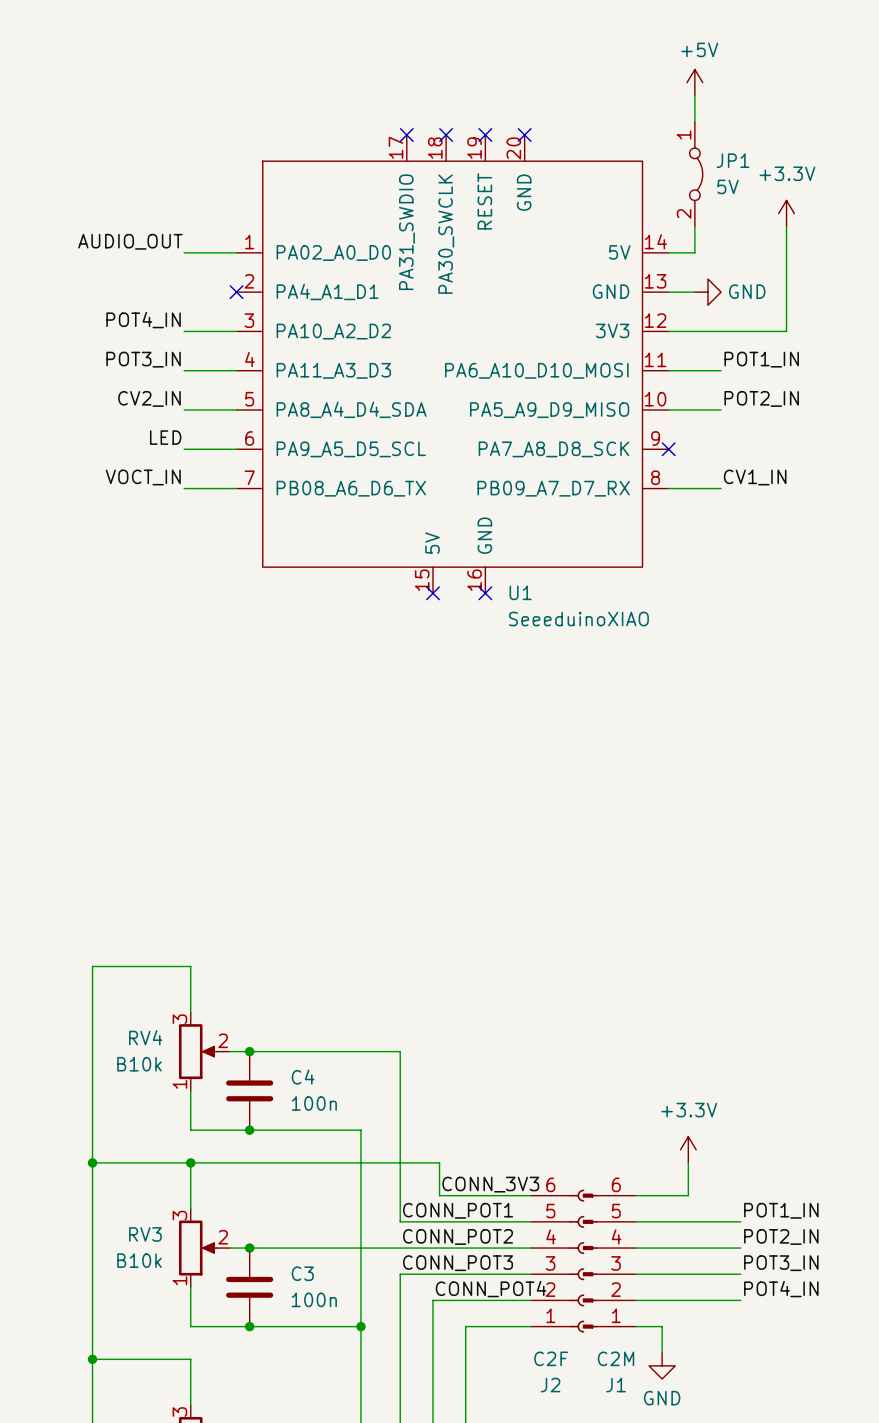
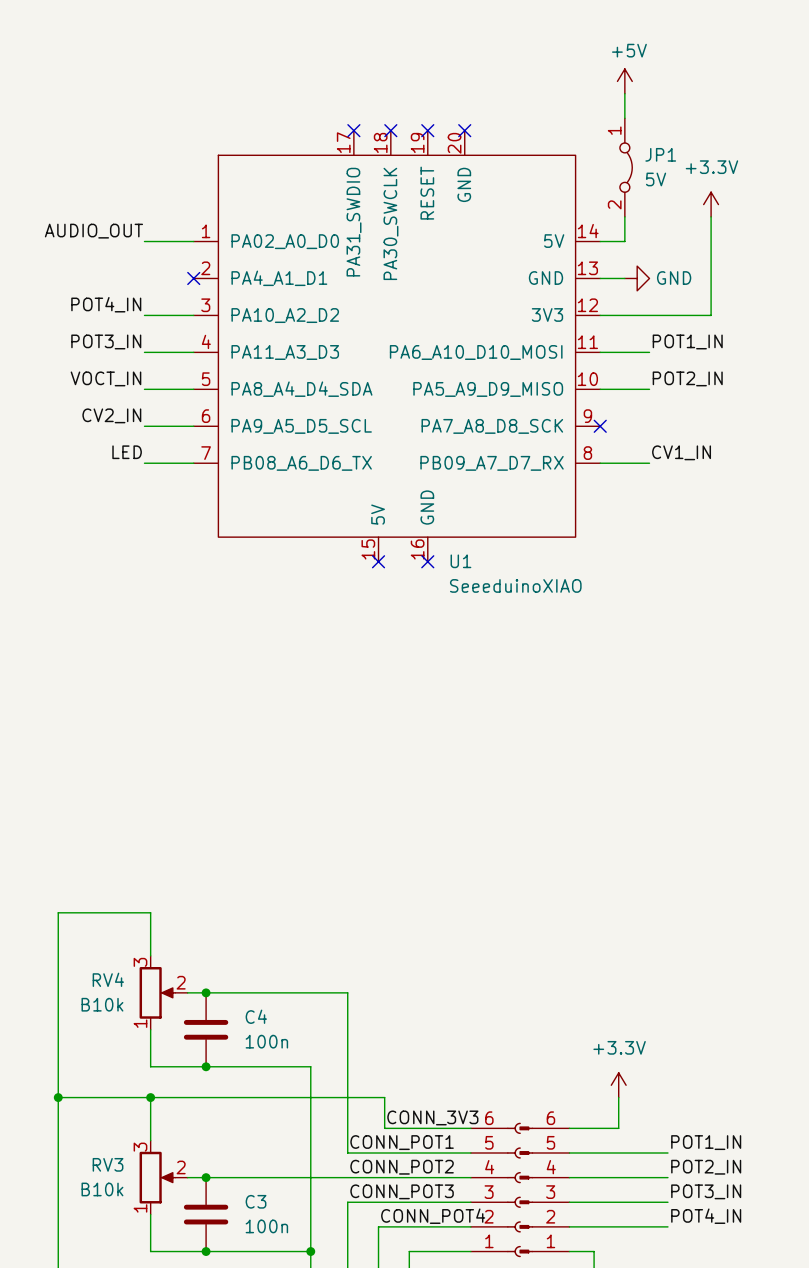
label: CV2_IN (149, 398) -> VOCT_IN (105, 378)
label: LED (165, 437) -> CV2_IN (111, 415)
label: VOCT_IN (143, 477) -> LED (127, 452)

